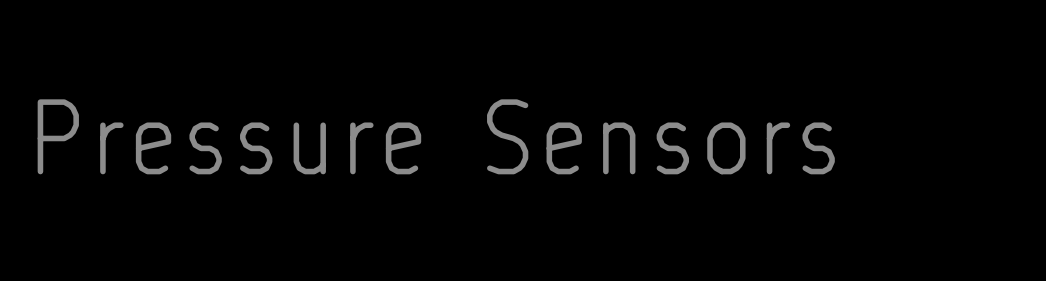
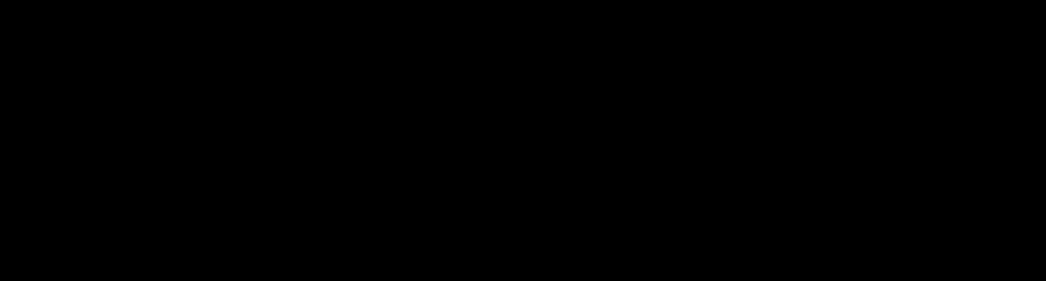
text: Pressure Sensors (436, 136) -> none

